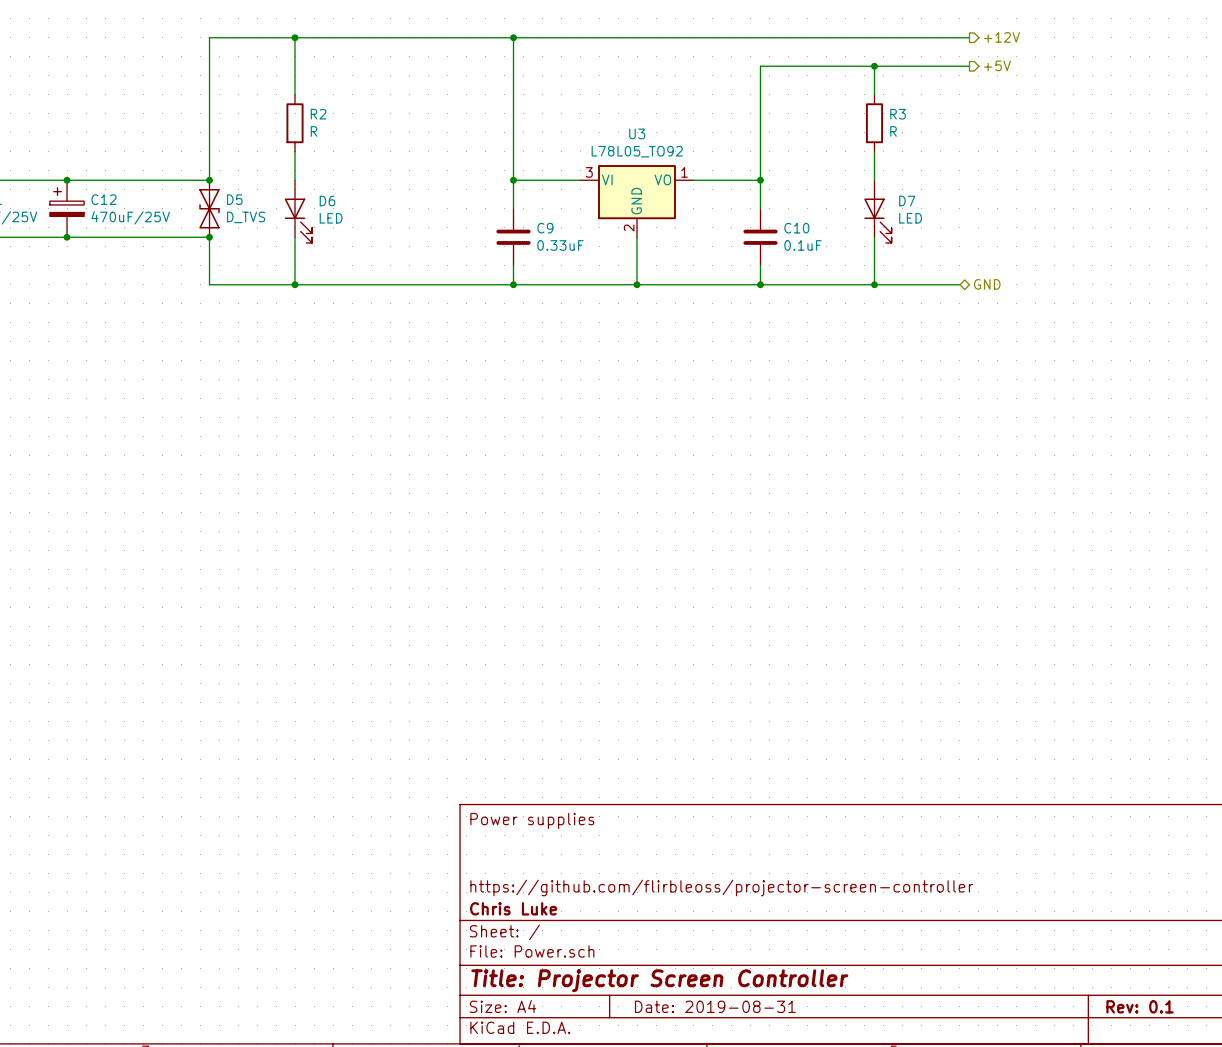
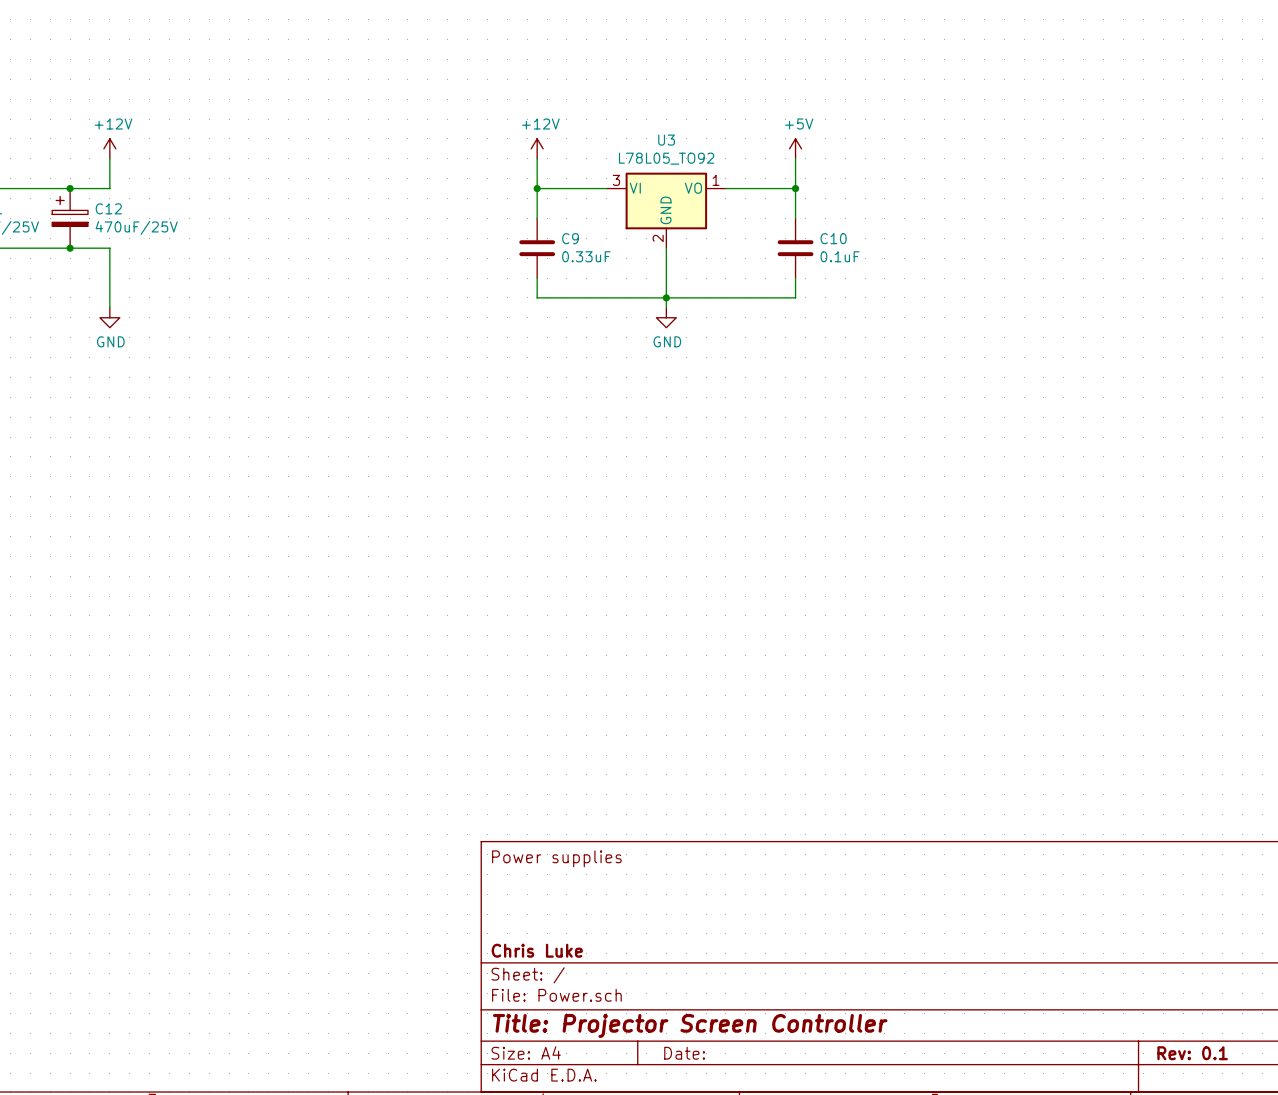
wire: (295, 37) (295, 94) -> none
junction: (295, 37) -> none
wire: (513, 37) (513, 151) -> none
junction: (513, 37) -> none
wire: (969, 37) (209, 37) (209, 180) (105, 180) -> (109, 158) (109, 188)
hierarchical label: +12V (1001, 37) -> none
hierarchical label: +5V (997, 65) -> none
wire: (874, 66) (874, 94) -> none
junction: (874, 66) -> none
wire: (969, 66) (760, 66) (760, 151) -> none
R2: R (295, 123) -> none
R3: R (874, 123) -> none
power symbol: none -> +12V (109, 148)
power symbol: none -> +12V (537, 148)
power symbol: none -> +5V (795, 148)
wire: (295, 151) (295, 180) -> none
wire: (874, 151) (874, 180) -> none
junction: (209, 180) -> none
D5: D_TVS (209, 208) -> none
D6: LED (298, 211) -> none
D7: LED (877, 211) -> none
wire: (105, 237) (209, 237) (209, 284) (513, 284) -> (109, 248) (109, 307)
junction: (209, 237) -> none
wire: (295, 237) (295, 284) -> none
wire: (874, 237) (874, 284) -> none
junction: (295, 284) -> none
junction: (513, 284) -> none
wire: none -> (666, 297) (666, 307)
wire: (760, 284) (959, 284) -> none
junction: (760, 284) -> none
junction: (874, 284) -> none
hierarchical label: GND (987, 284) -> none
power symbol: none -> GND (109, 317)
power symbol: none -> GND (666, 317)
title block: https://github.com/flirbleoss/projector-screen-controller (721, 887) -> none
title block: Date: 2019-08-31 (715, 1006) -> Date: (684, 1053)

